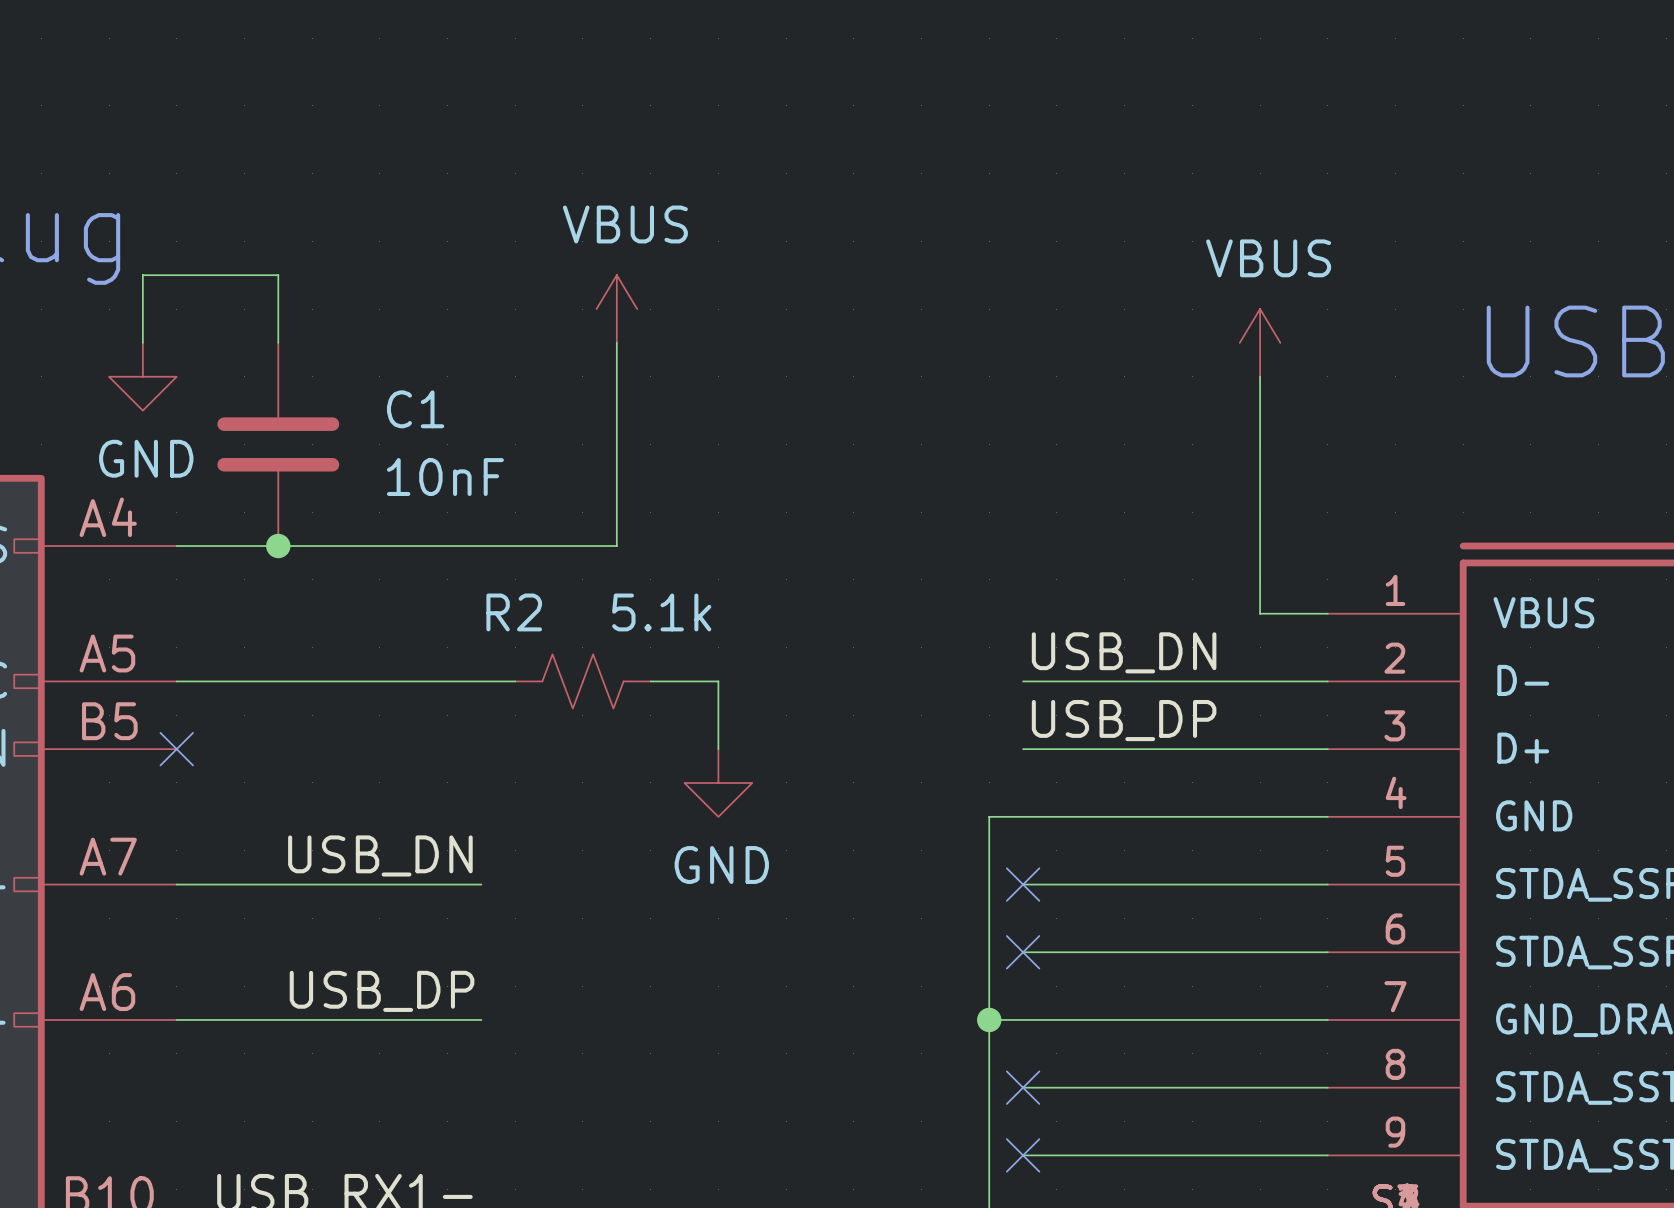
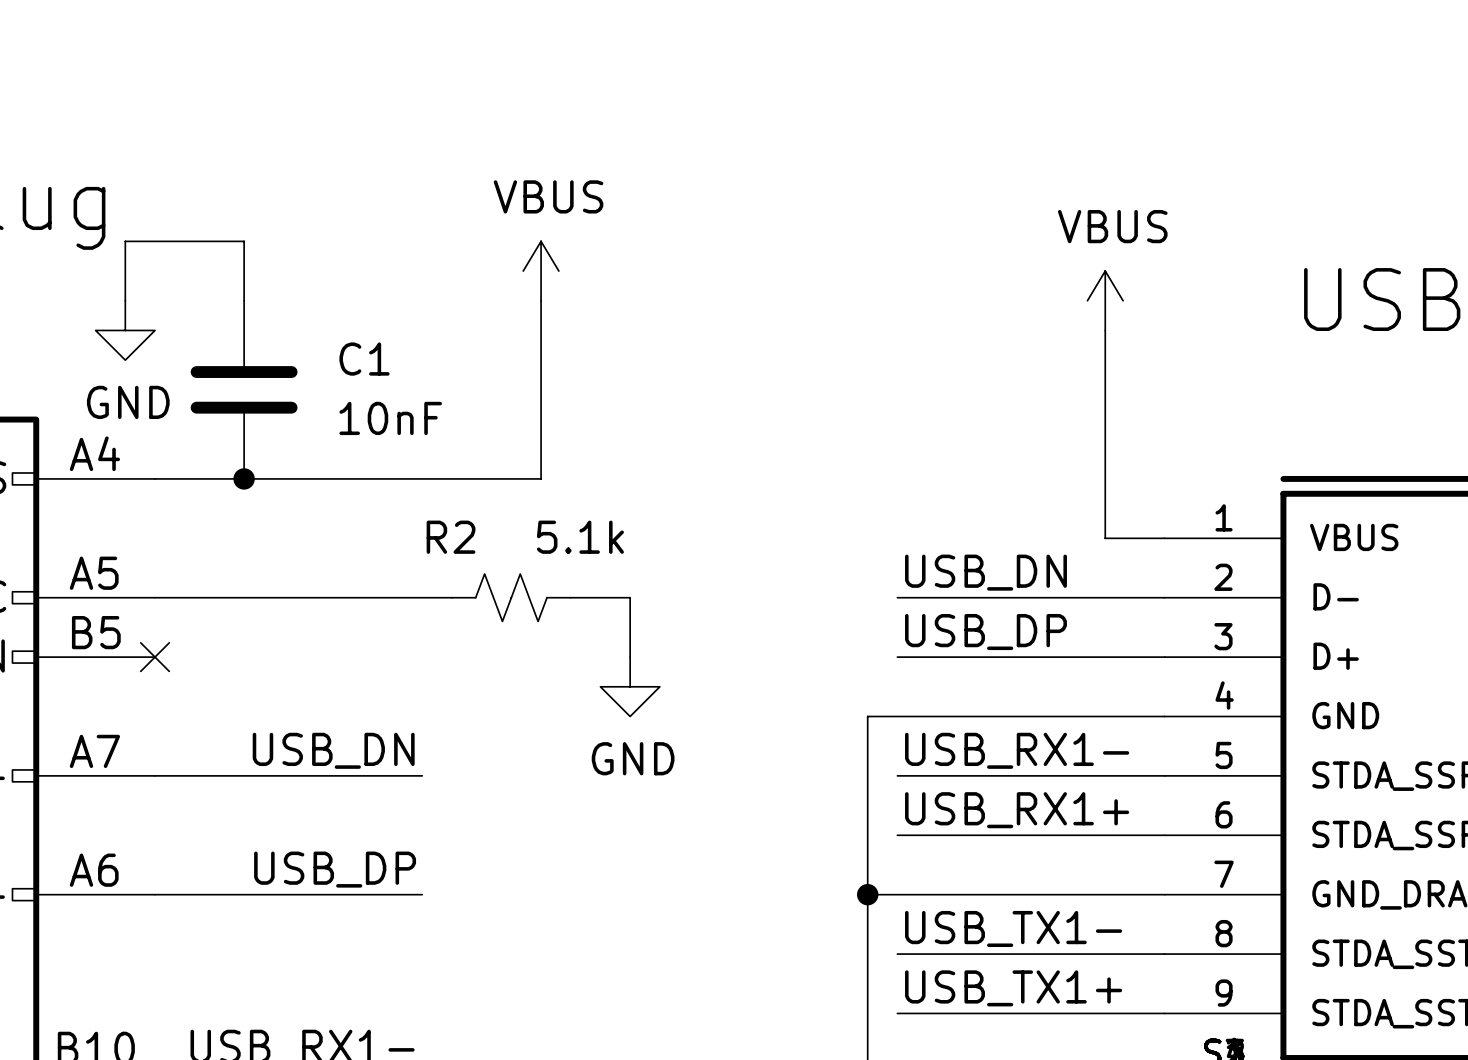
label: none -> USB_RX1- (1017, 750)
no-connect mark: (1023, 884) -> none
label: none -> USB_RX1+ (1017, 810)
no-connect mark: (1023, 952) -> none
label: none -> USB_TX1- (1013, 928)
no-connect mark: (1023, 1087) -> none
label: none -> USB_TX1+ (1013, 988)
no-connect mark: (1023, 1155) -> none

